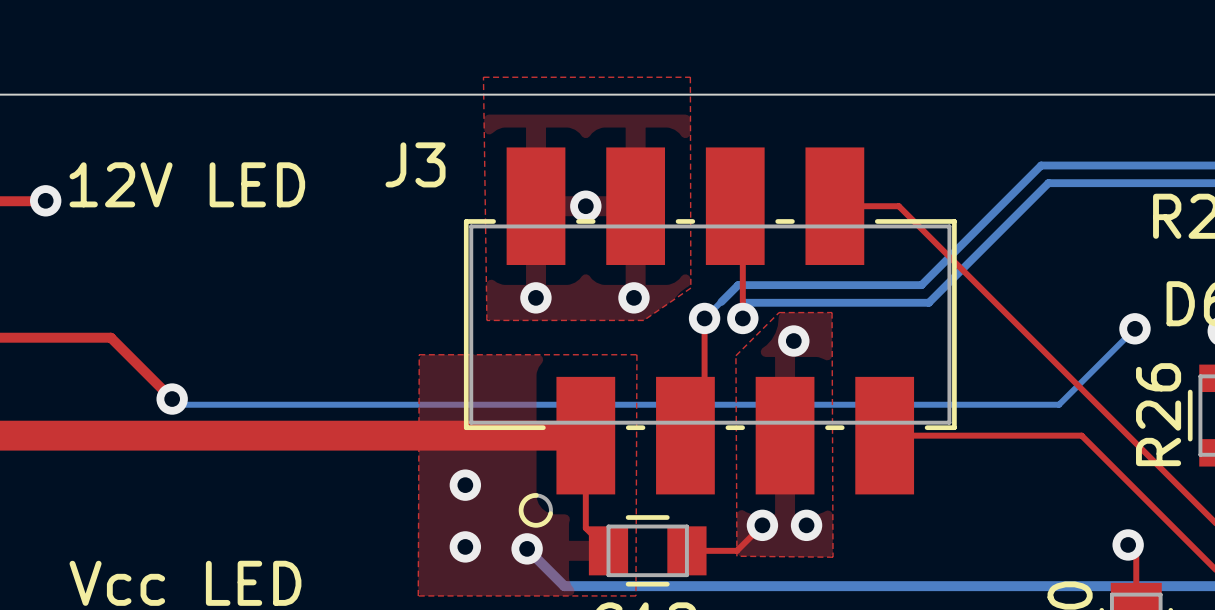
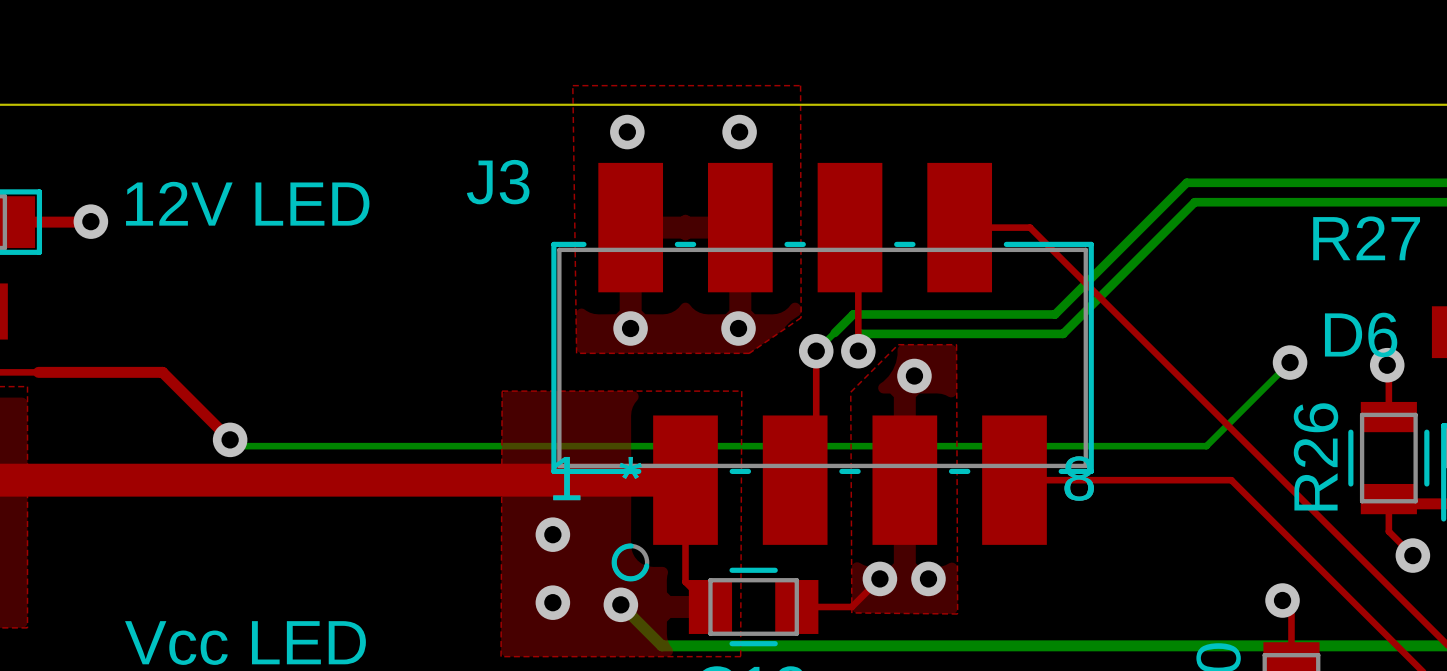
via: none -> (627, 132)
via: none -> (739, 132)
J3 footprint: [463, 147, 957, 528] -> [551, 162, 1094, 582]
via: (585, 206) -> none

